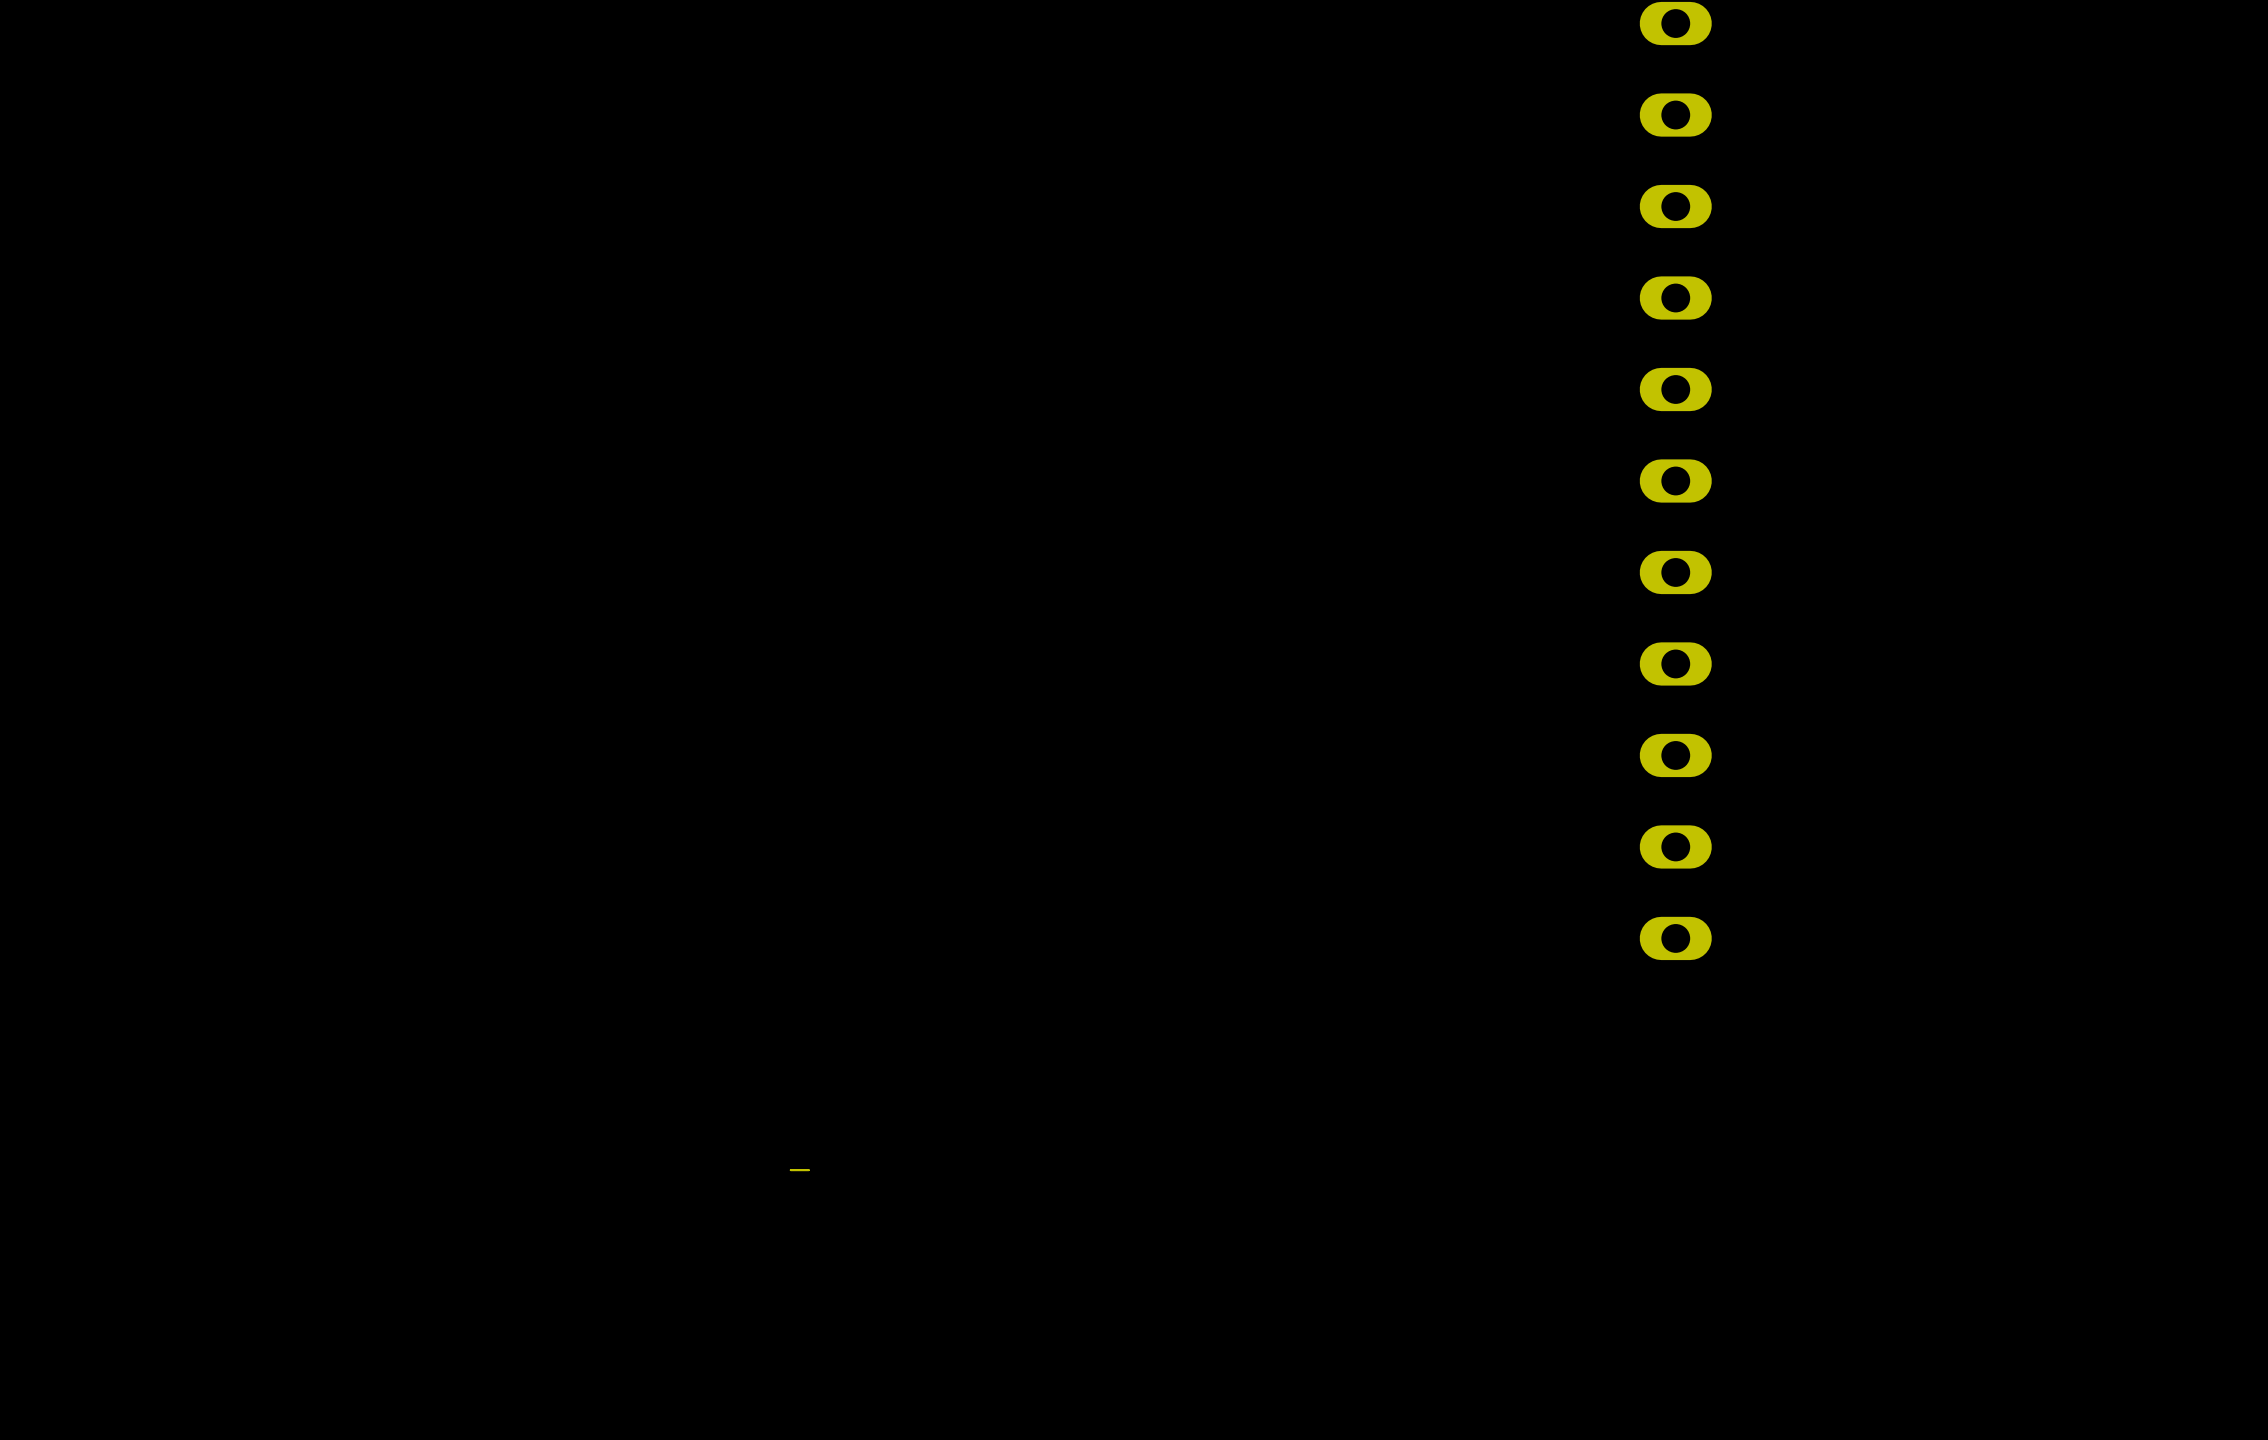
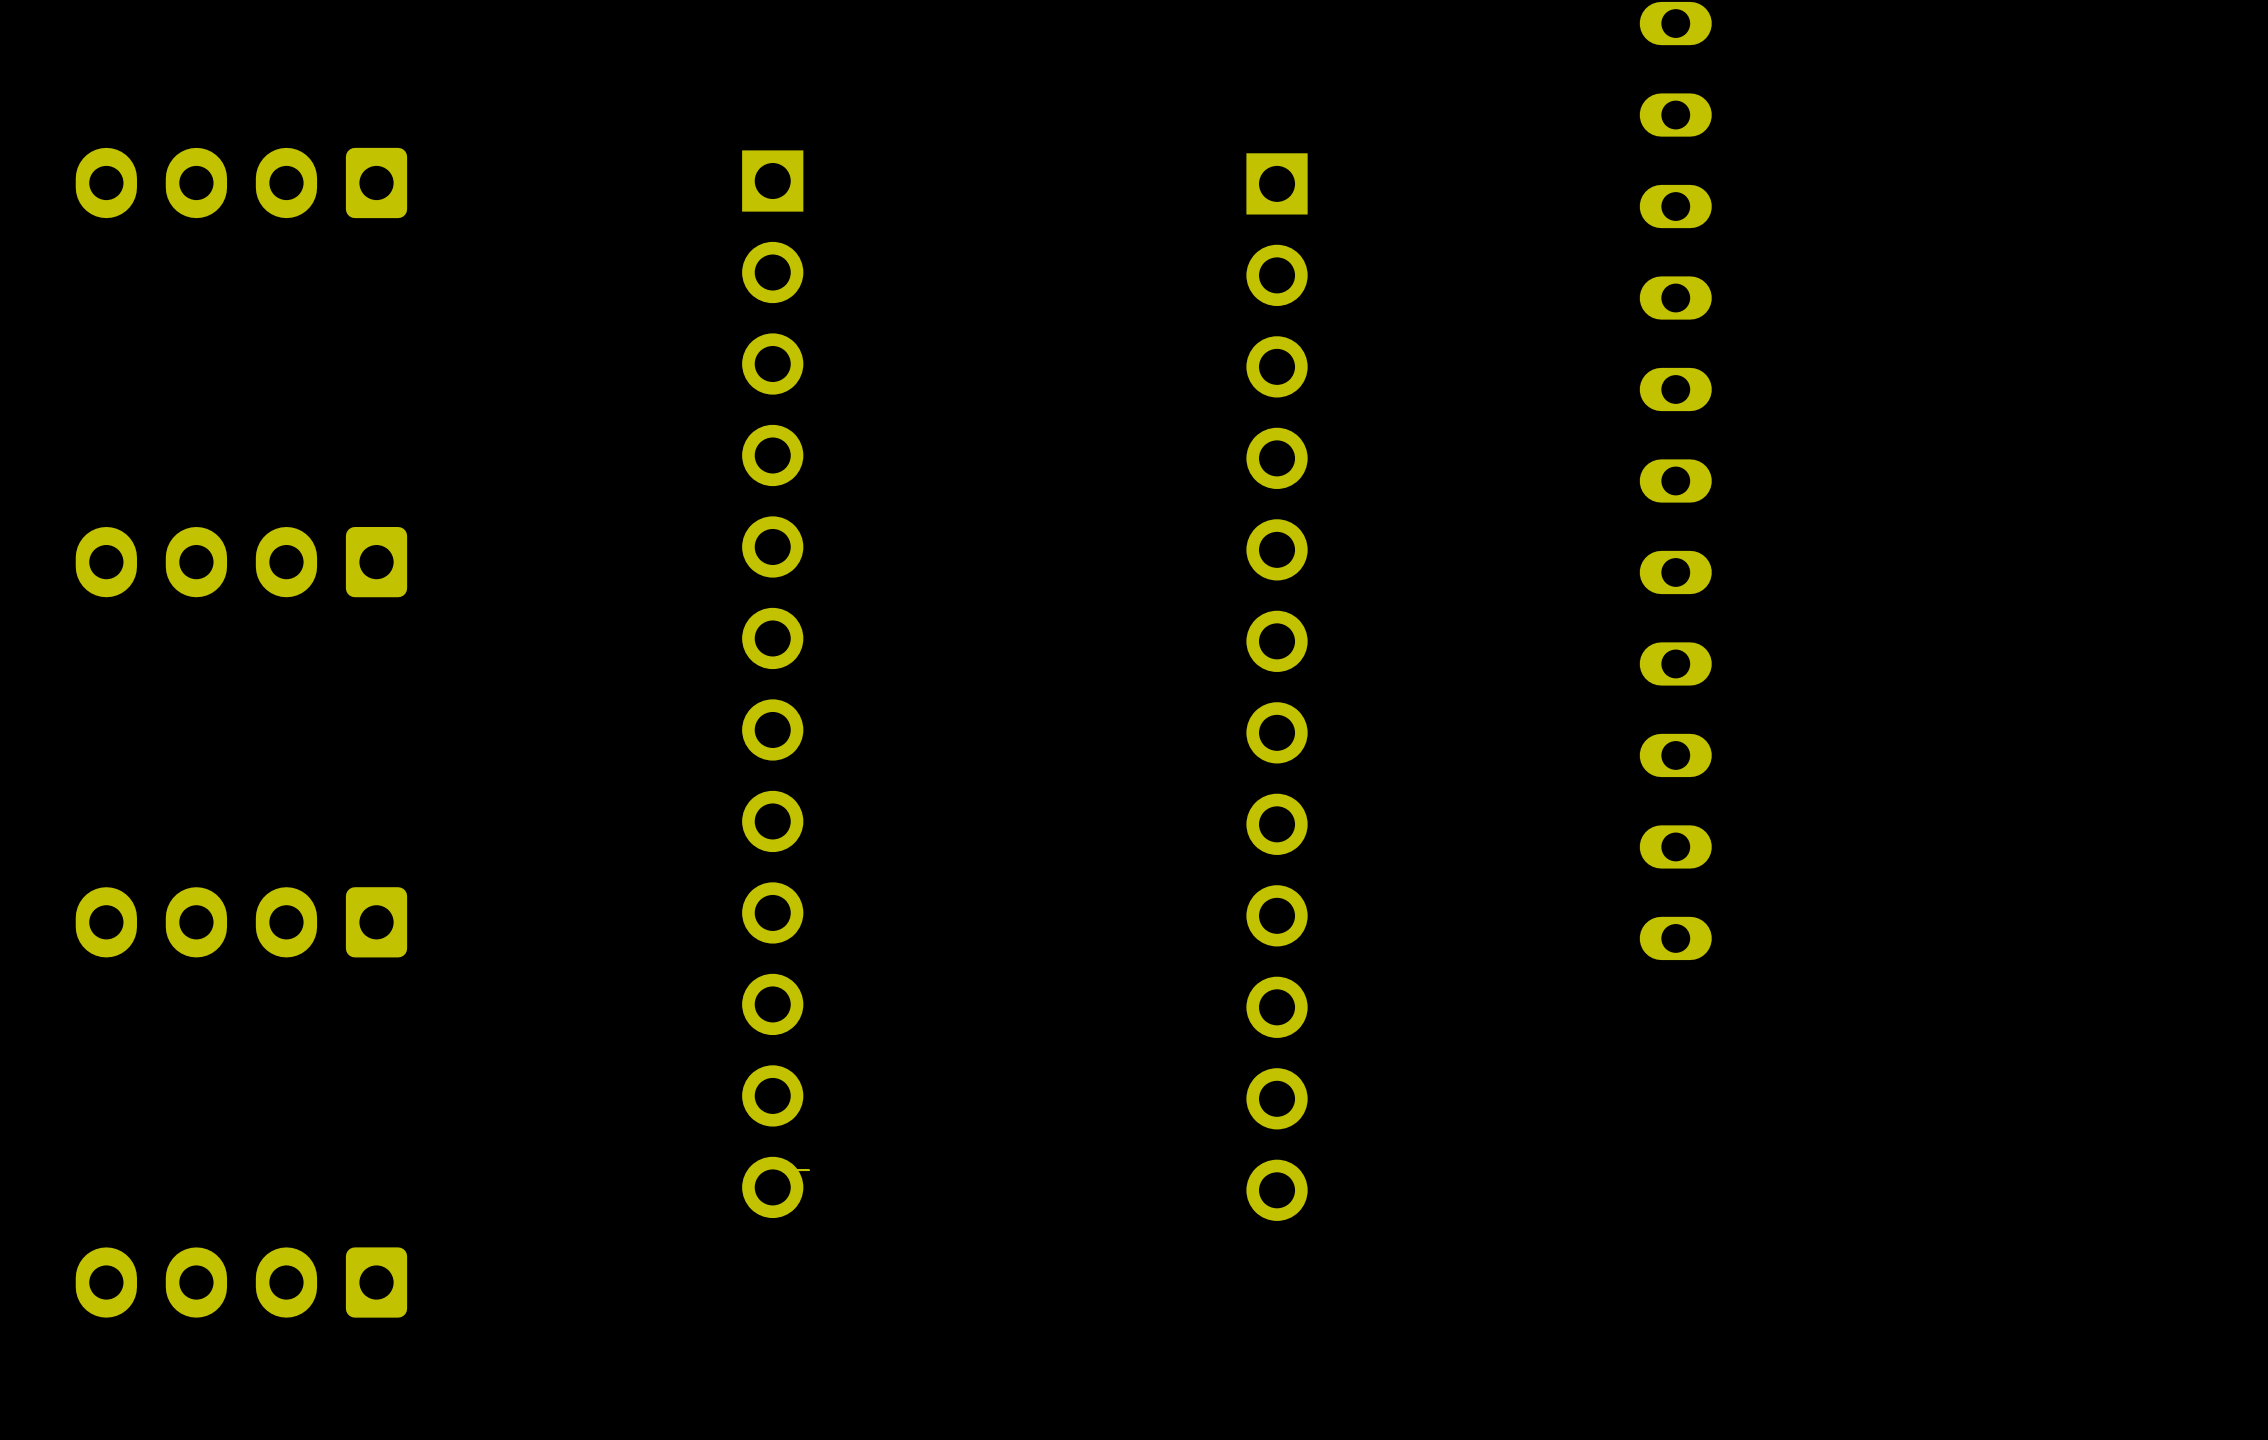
part: none -> (241, 182)
part: none -> (241, 562)
part: none -> (772, 684)
part: none -> (1277, 687)
part: none -> (241, 922)
part: none -> (241, 1282)

